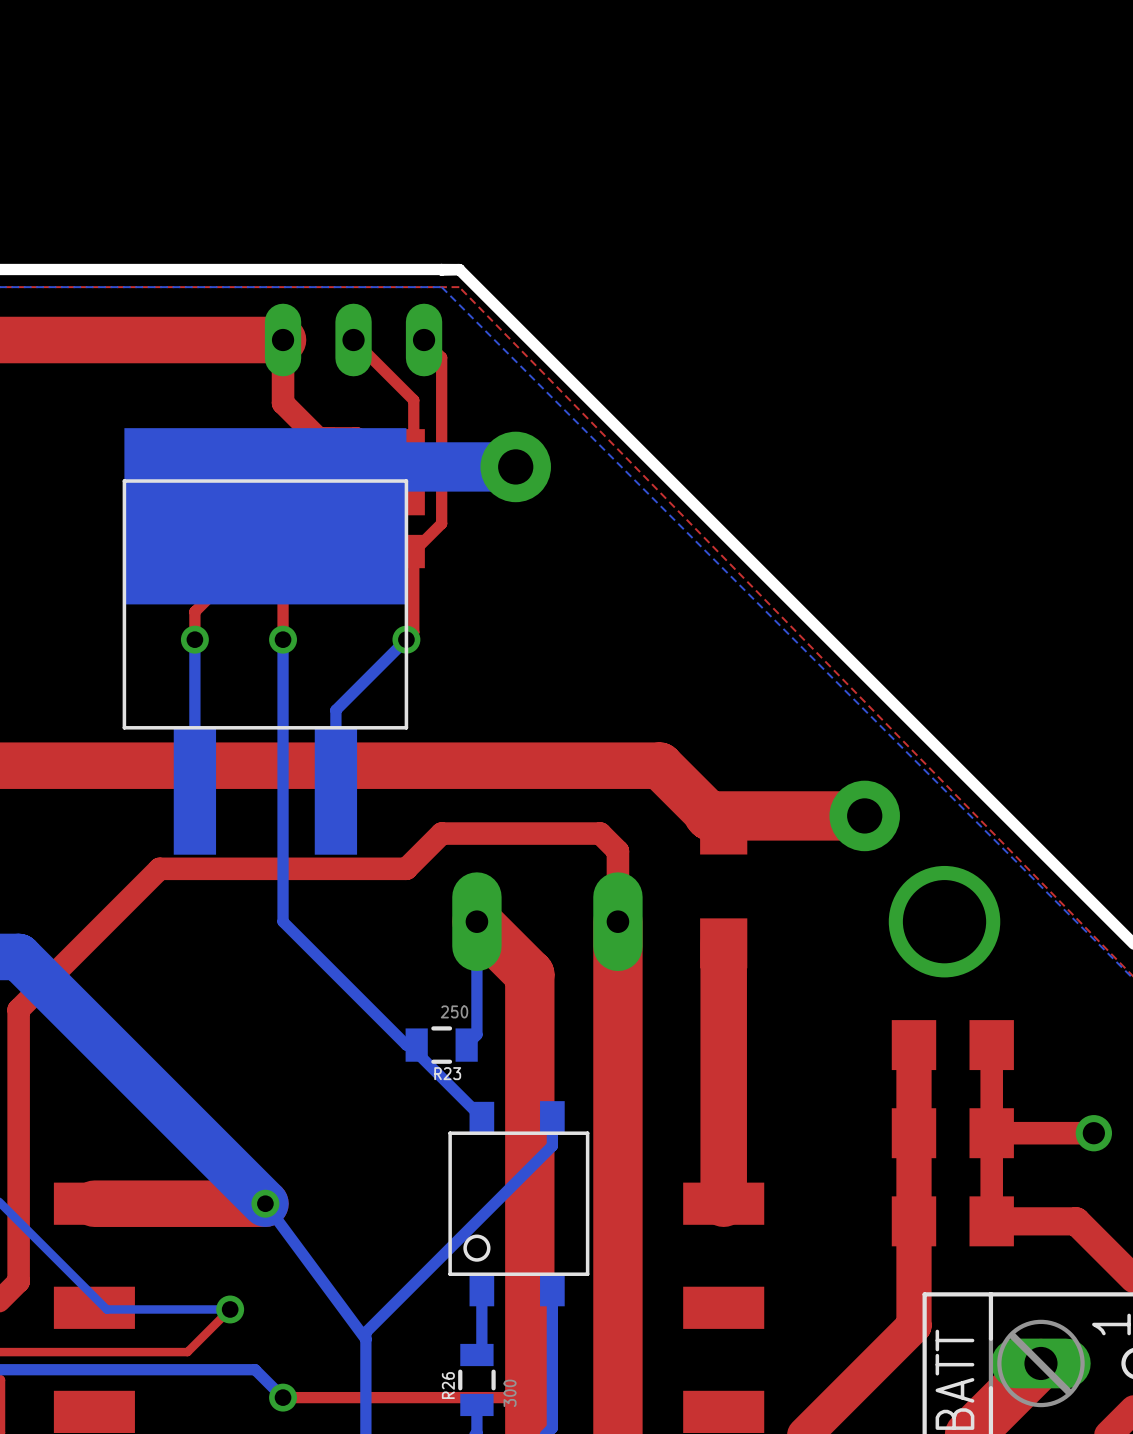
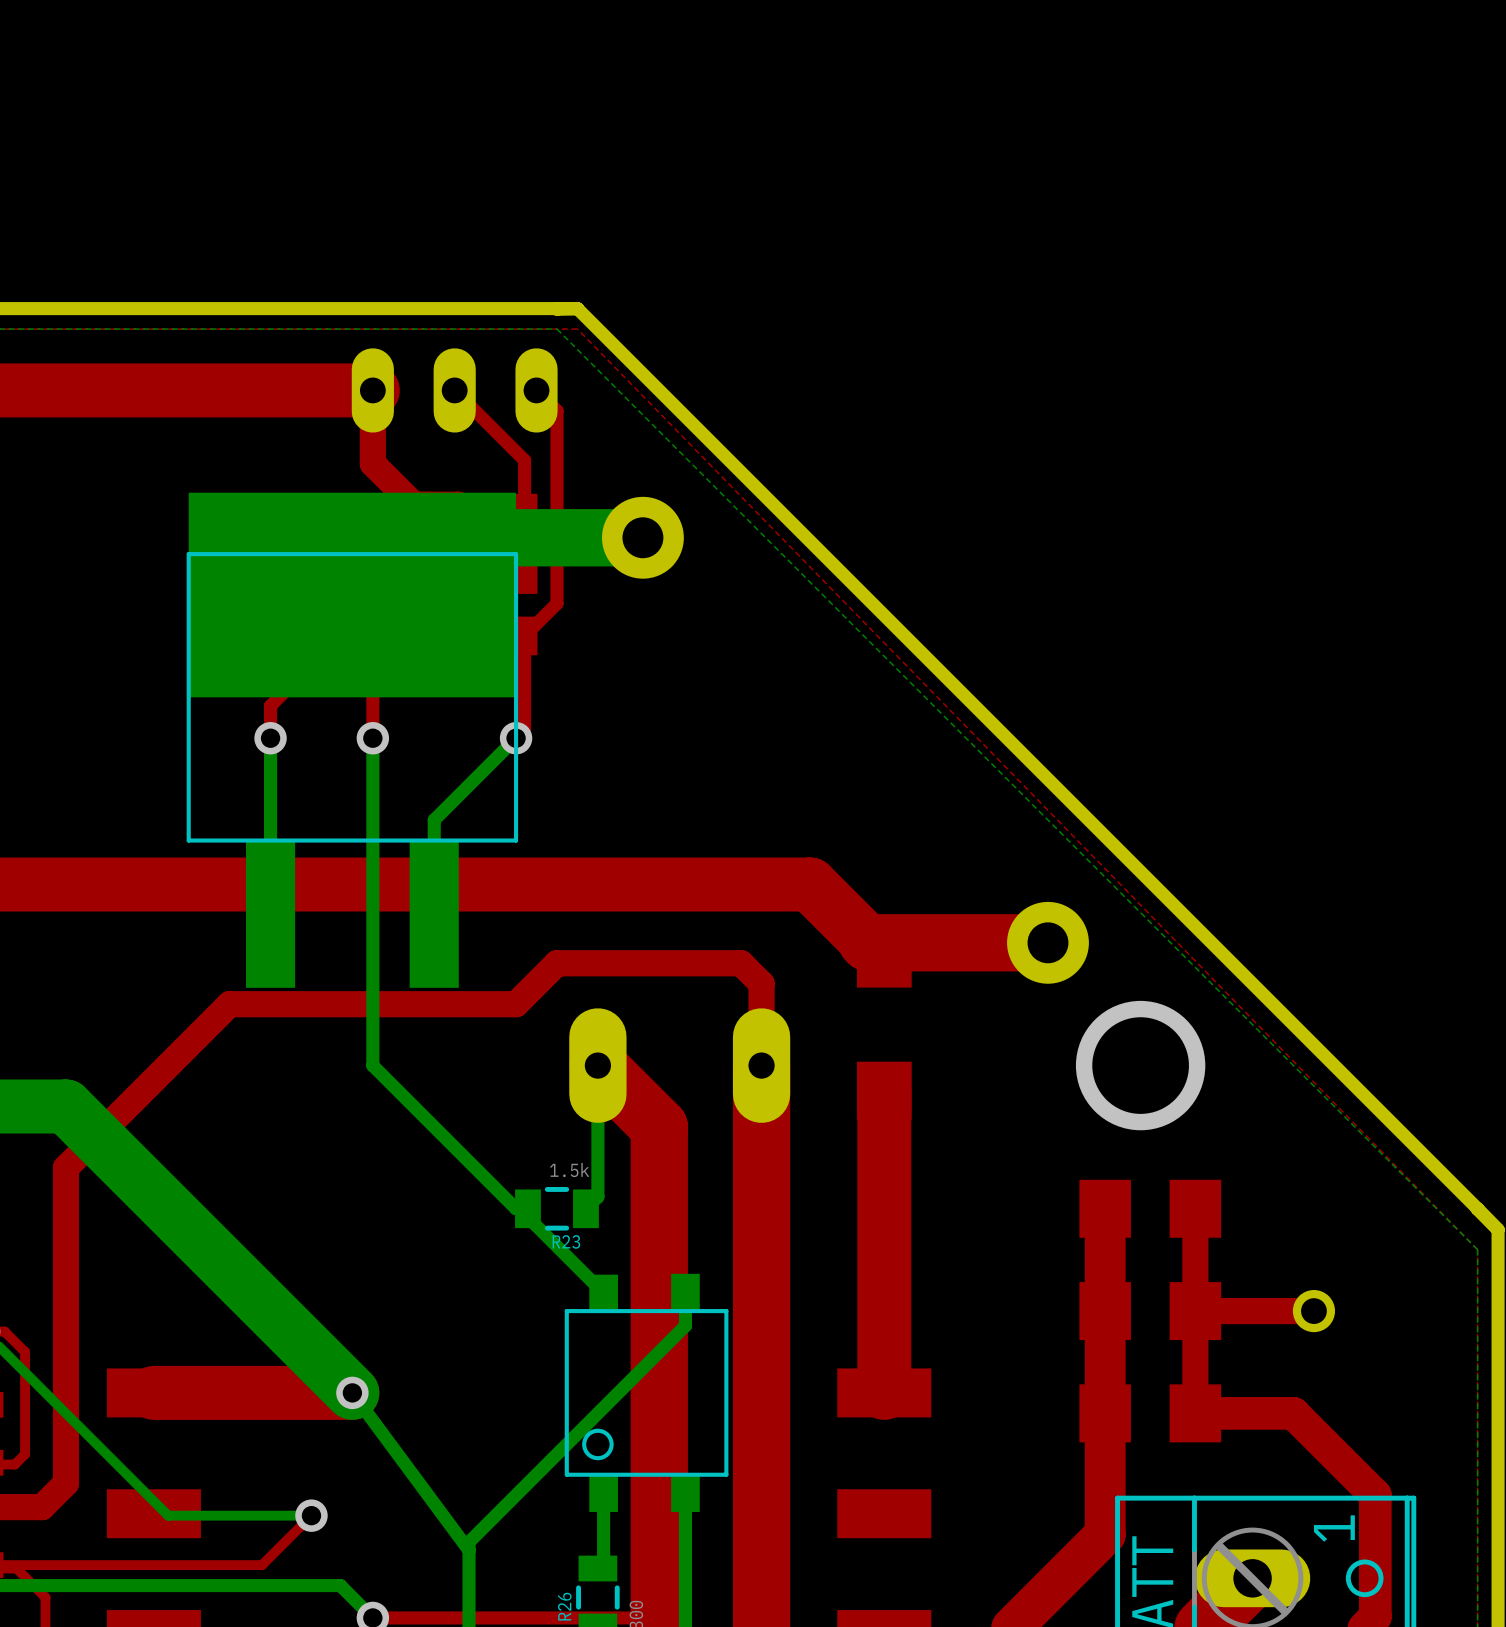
R23 value: 250 (454, 1011) -> 1.5k (569, 1170)

